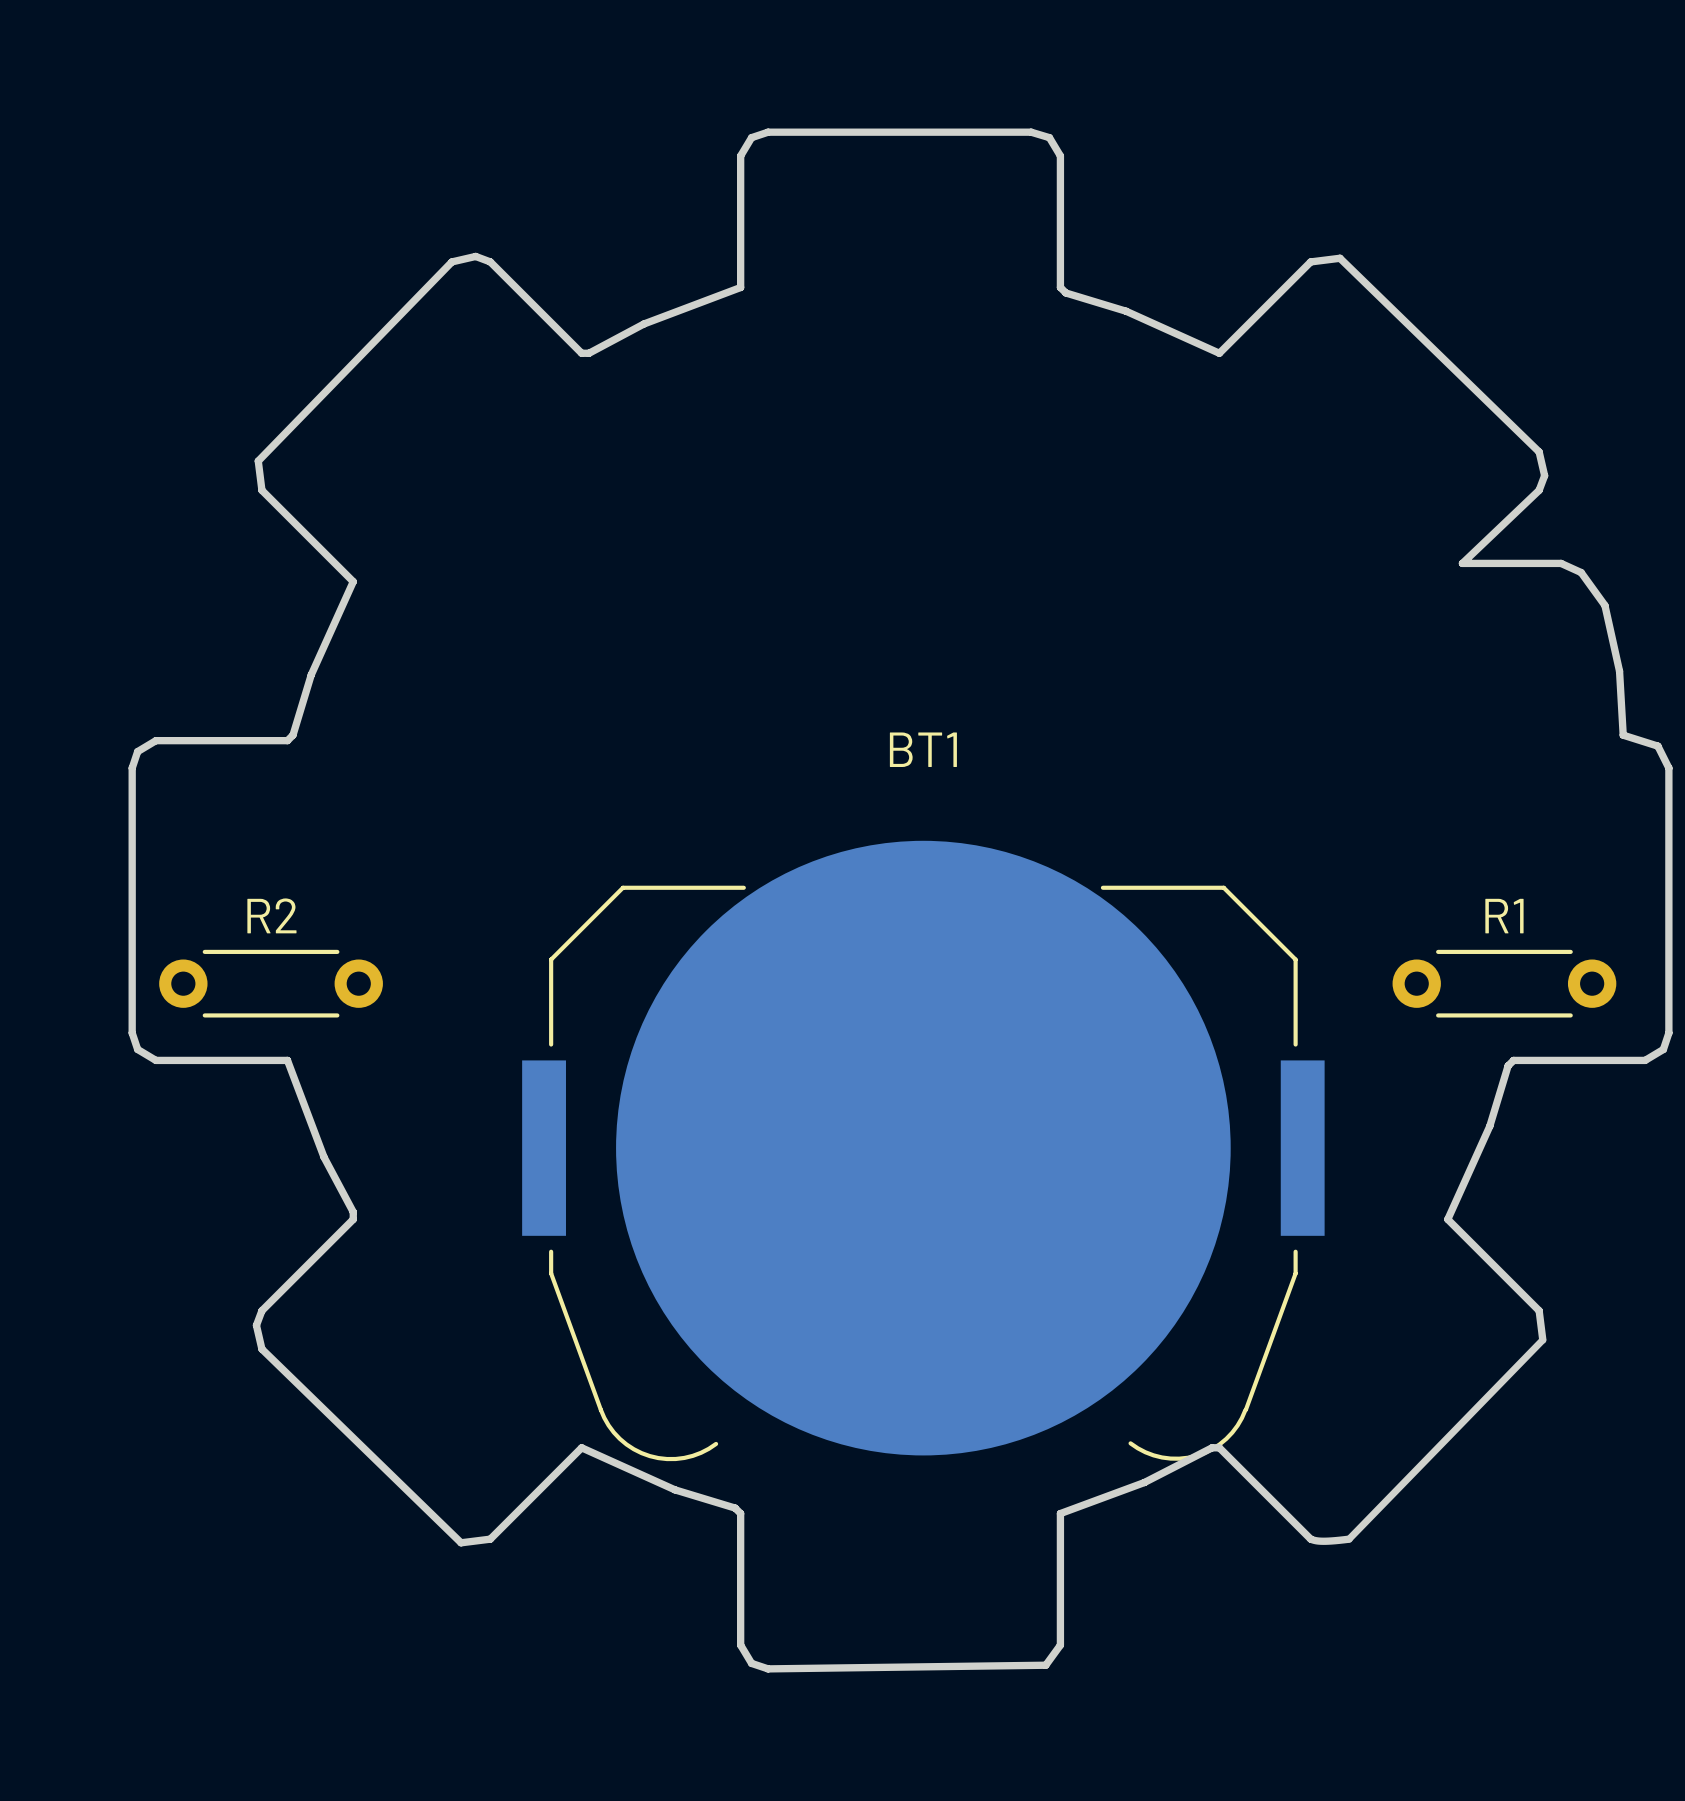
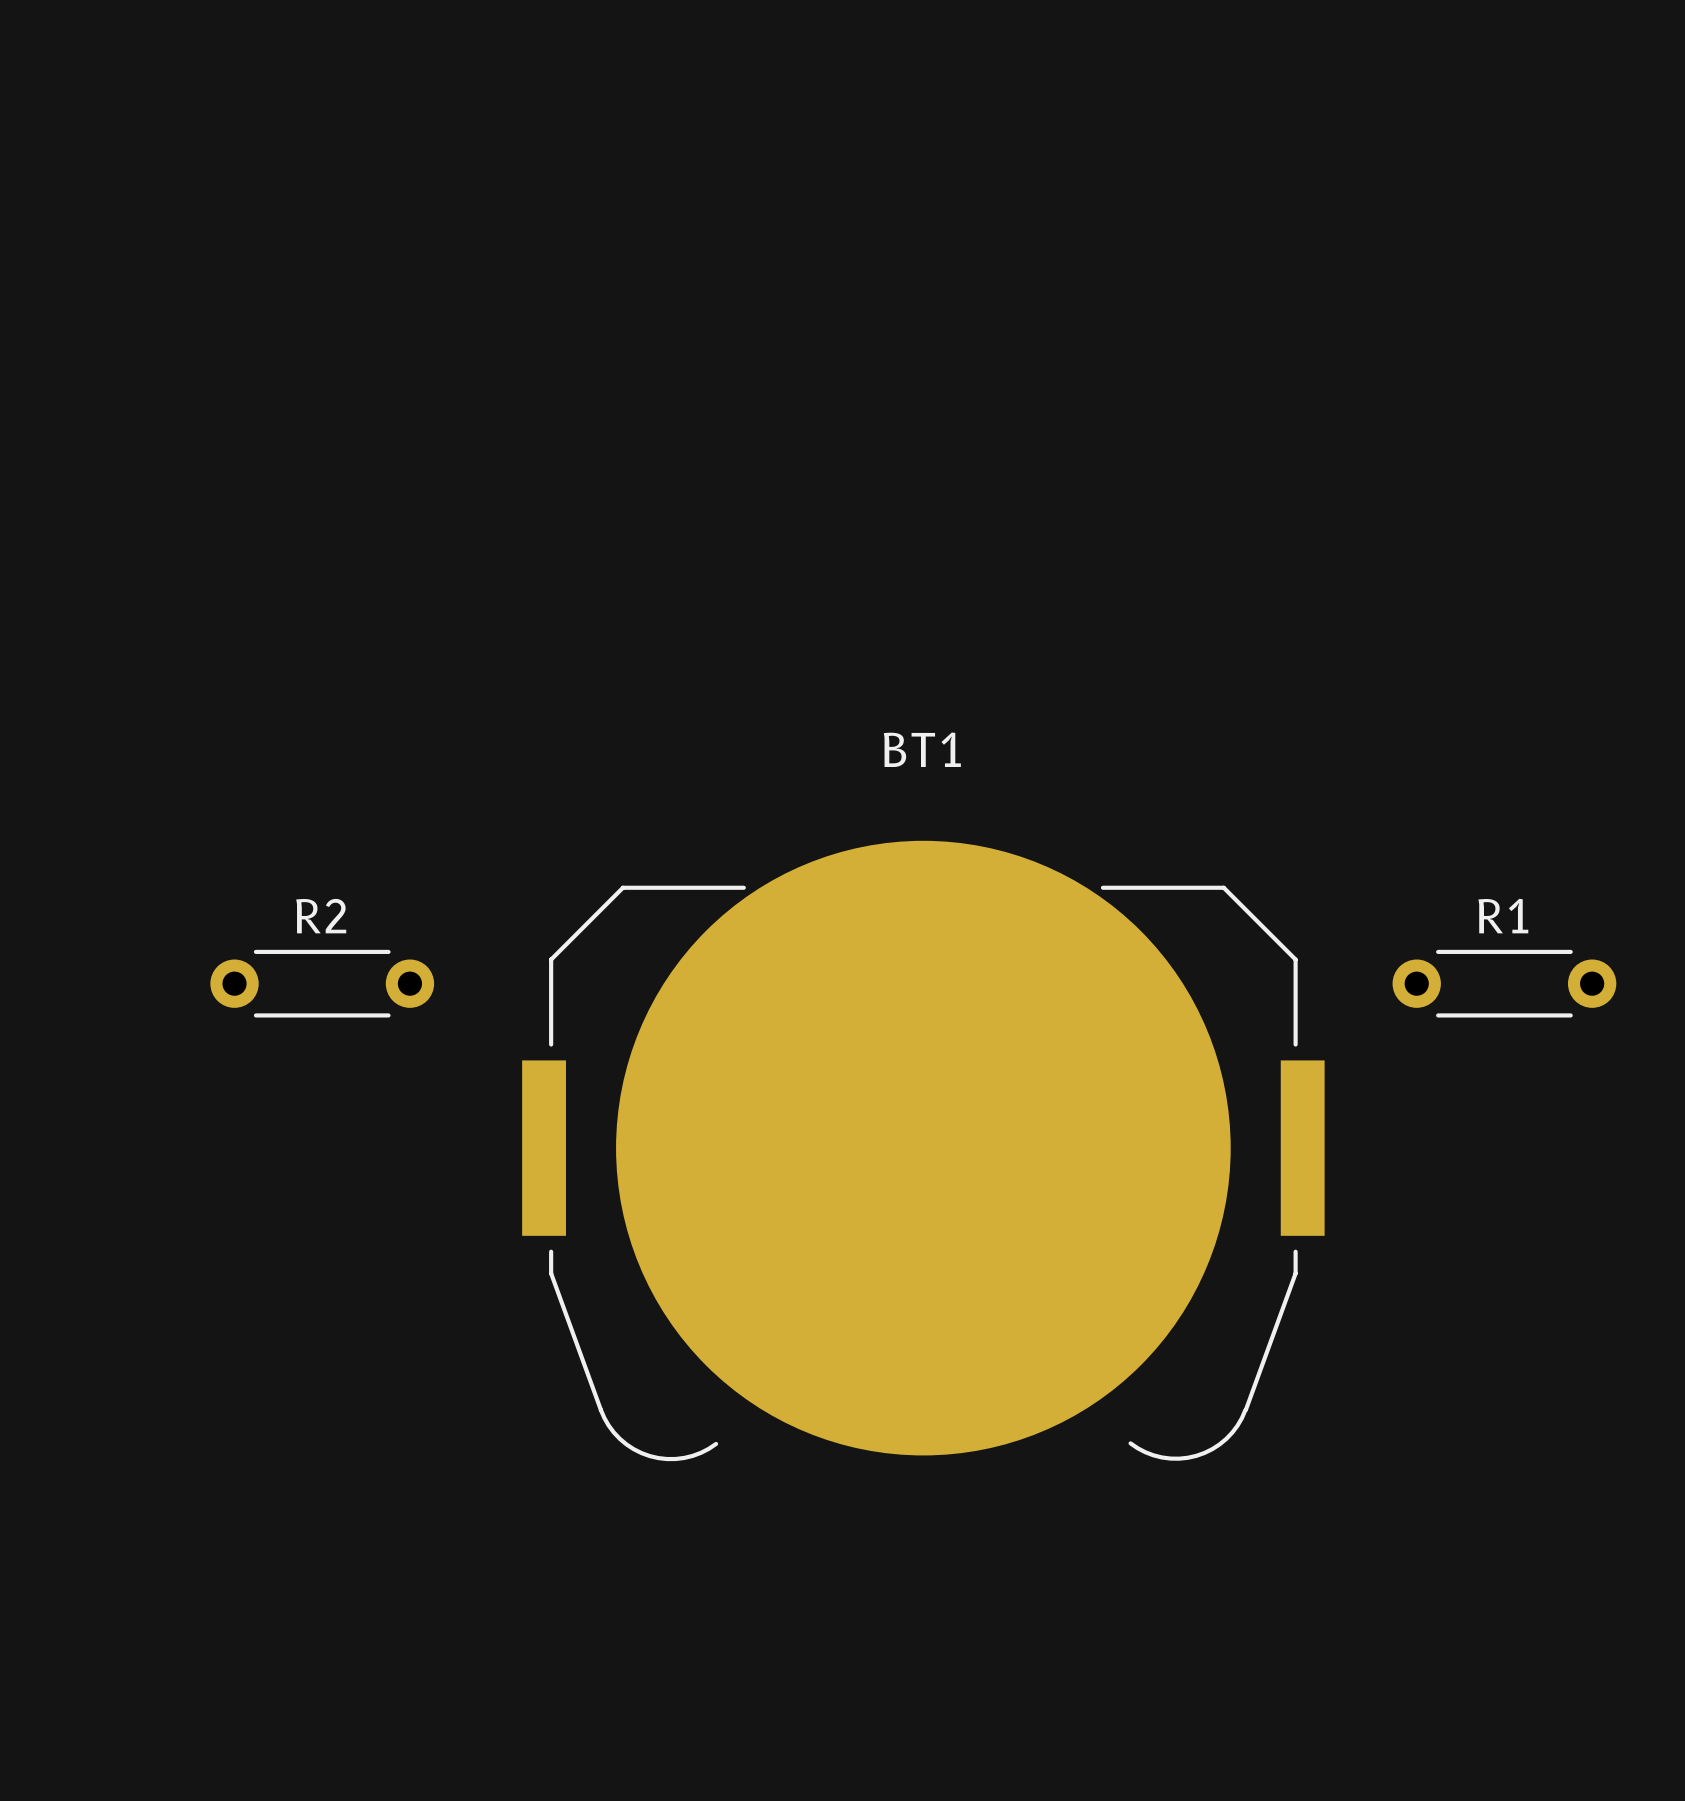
board edge: (1031, 132) (768, 132) (751, 137) (740, 155) (740, 287) (643, 324) (588, 353) (581, 353) (490, 261) (475, 256) (451, 261) (258, 461) (261, 490) (353, 581) (311, 674) (292, 735) (287, 740) (155, 740) (137, 751) (132, 768) (132, 1033) (137, 1049) (155, 1060) (287, 1060) (324, 1157) (353, 1212) (353, 1219) (261, 1310) (256, 1325) (261, 1349) (461, 1542) (490, 1539) (581, 1447) (674, 1489) (735, 1508) (740, 1513) (740, 1645) (751, 1663) (768, 1668) (1045, 1665) (1060, 1645) (1060, 1513) (1144, 1482) (1212, 1447) (1219, 1447) (1310, 1539) (1323, 1541) (1349, 1539) (1542, 1339) (1539, 1310) (1447, 1219) (1489, 1126) (1508, 1065) (1513, 1060) (1645, 1060) (1663, 1049) (1668, 1033) (1668, 768) (1657, 746) (1623, 735) (1619, 671) (1604, 605) (1581, 572) (1561, 563) (1462, 563) (1539, 490) (1544, 475) (1539, 451) (1339, 258) (1310, 261) (1219, 353) (1126, 311) (1065, 292) (1060, 287) (1060, 155) (1049, 137) (1031, 132) -> none
R2 position: (271, 983) -> (322, 983)

